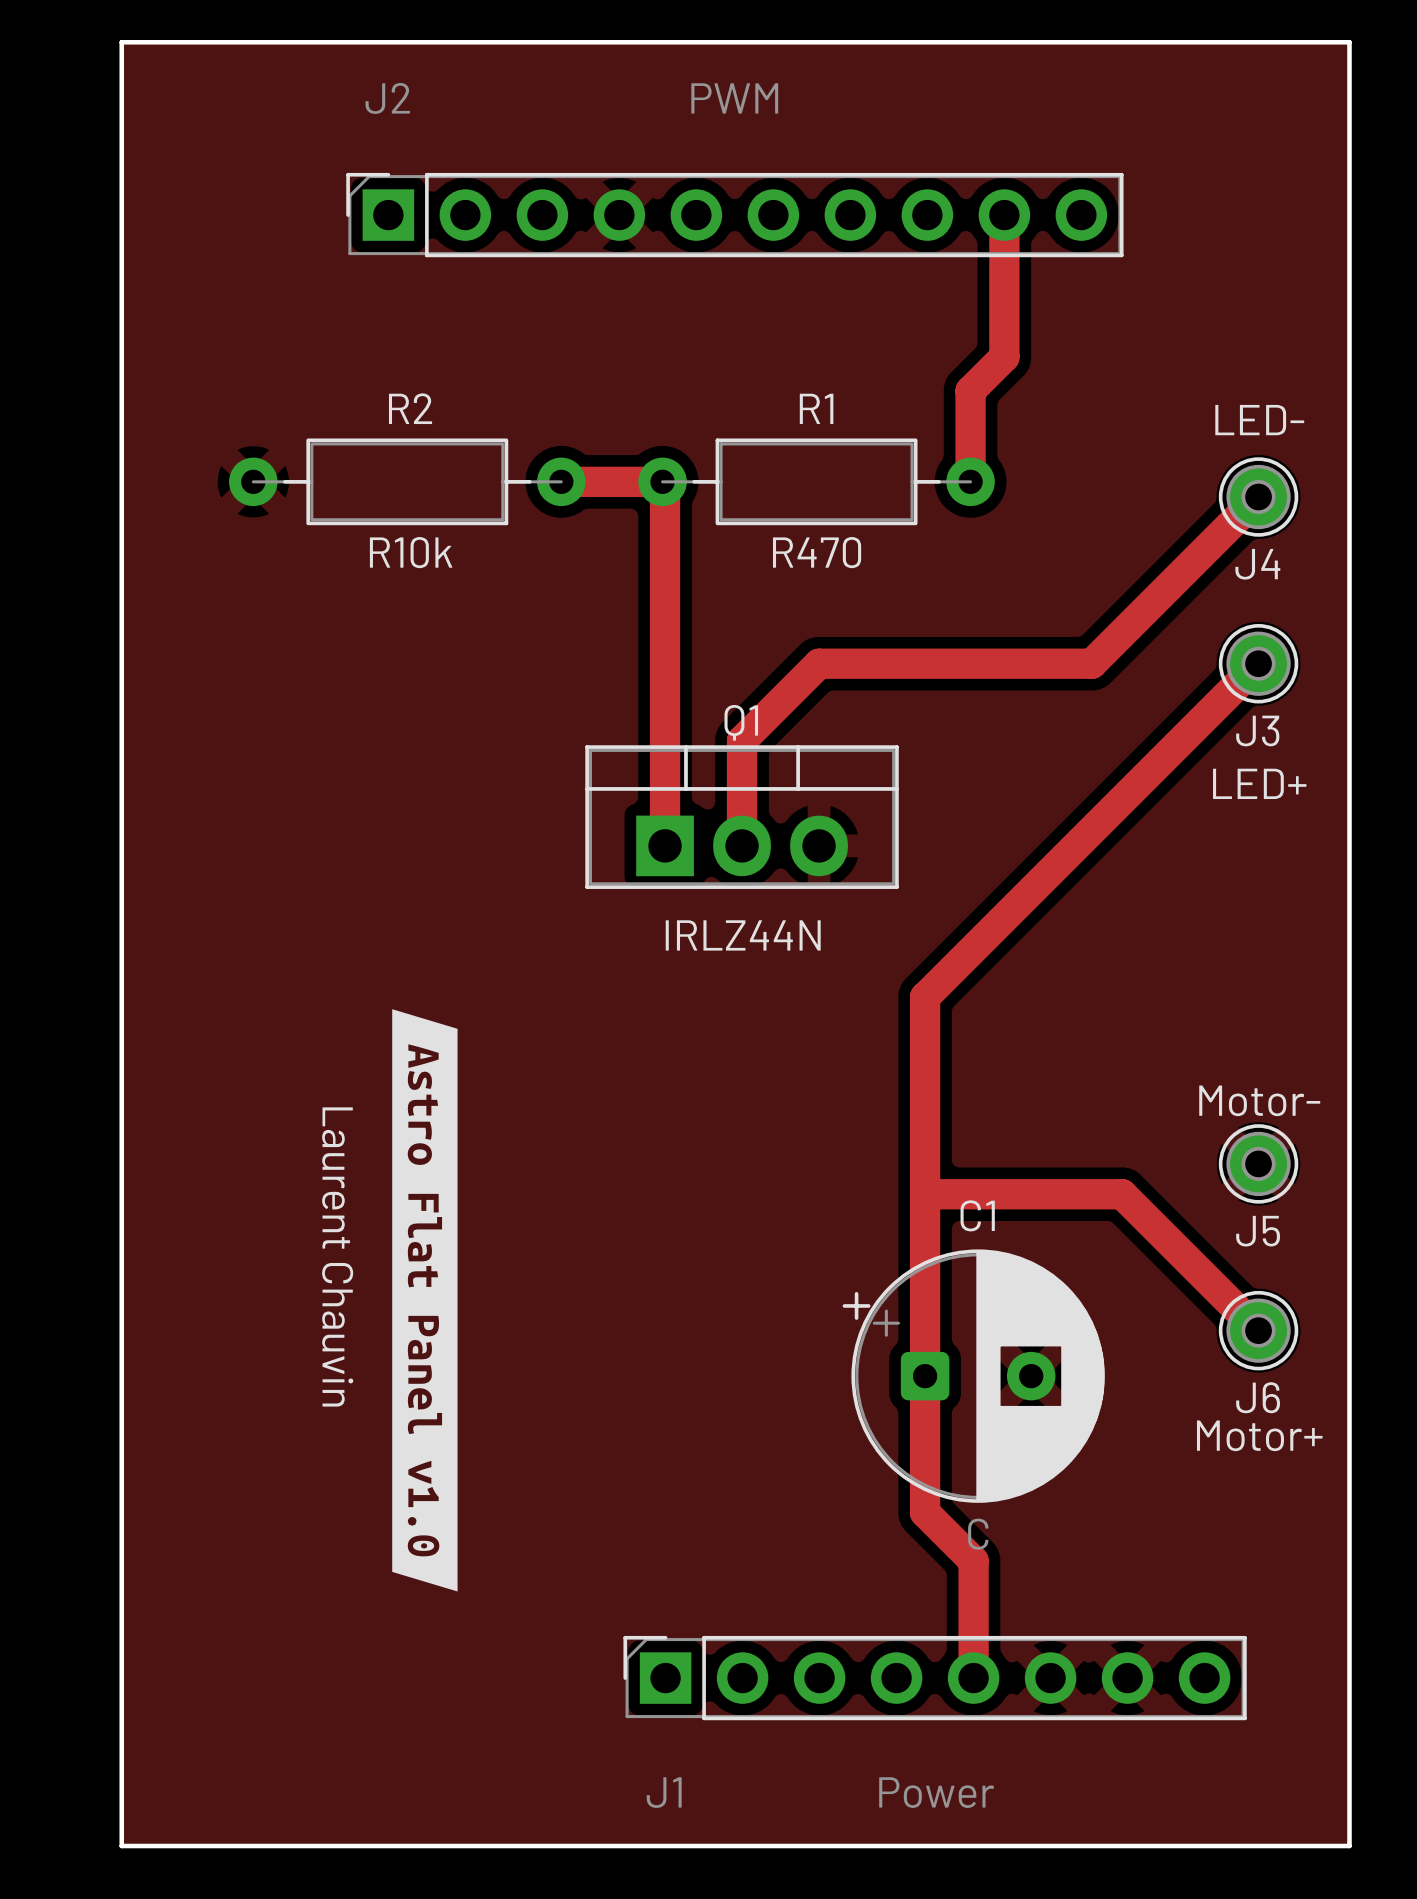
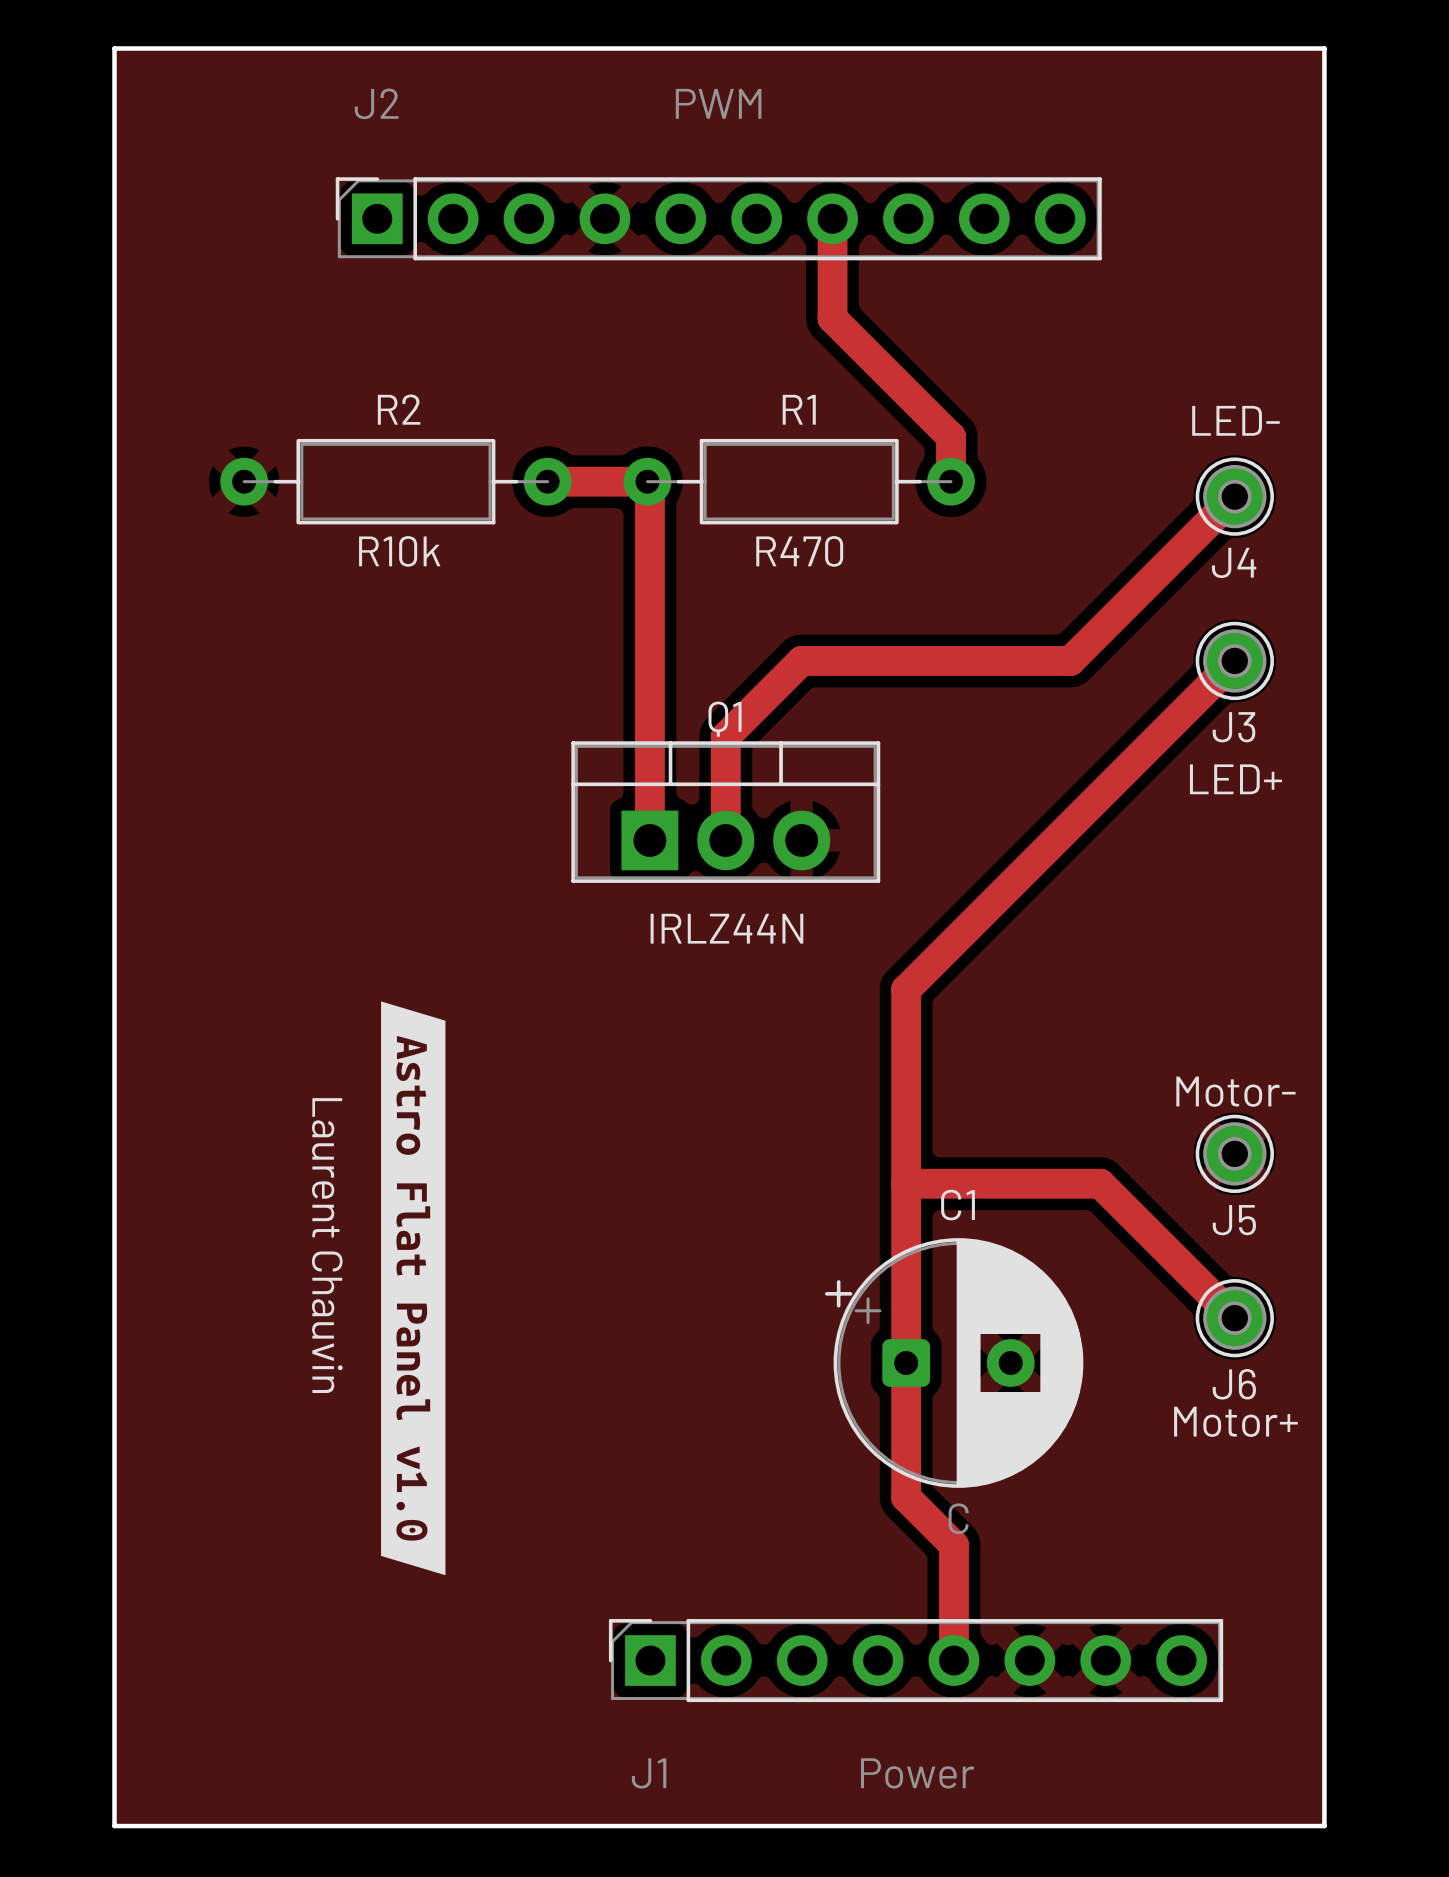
track: (1004, 215) (1004, 357) (970, 390) (970, 436) -> (832, 218) (832, 318) (950, 436)

